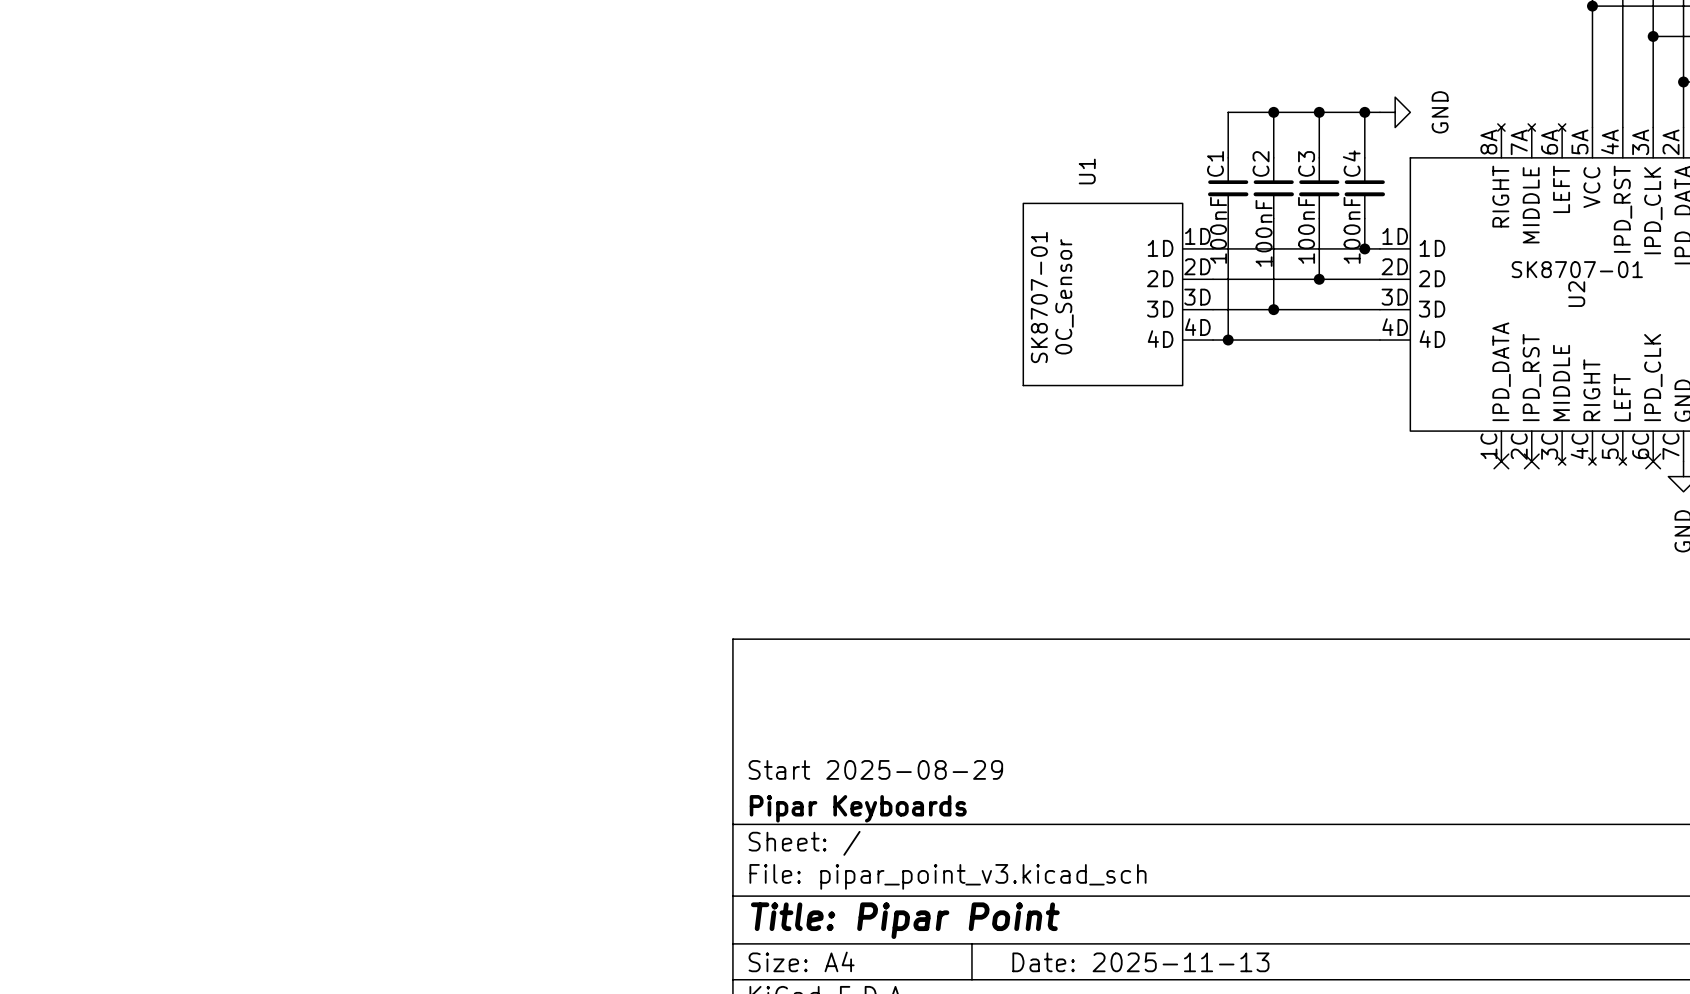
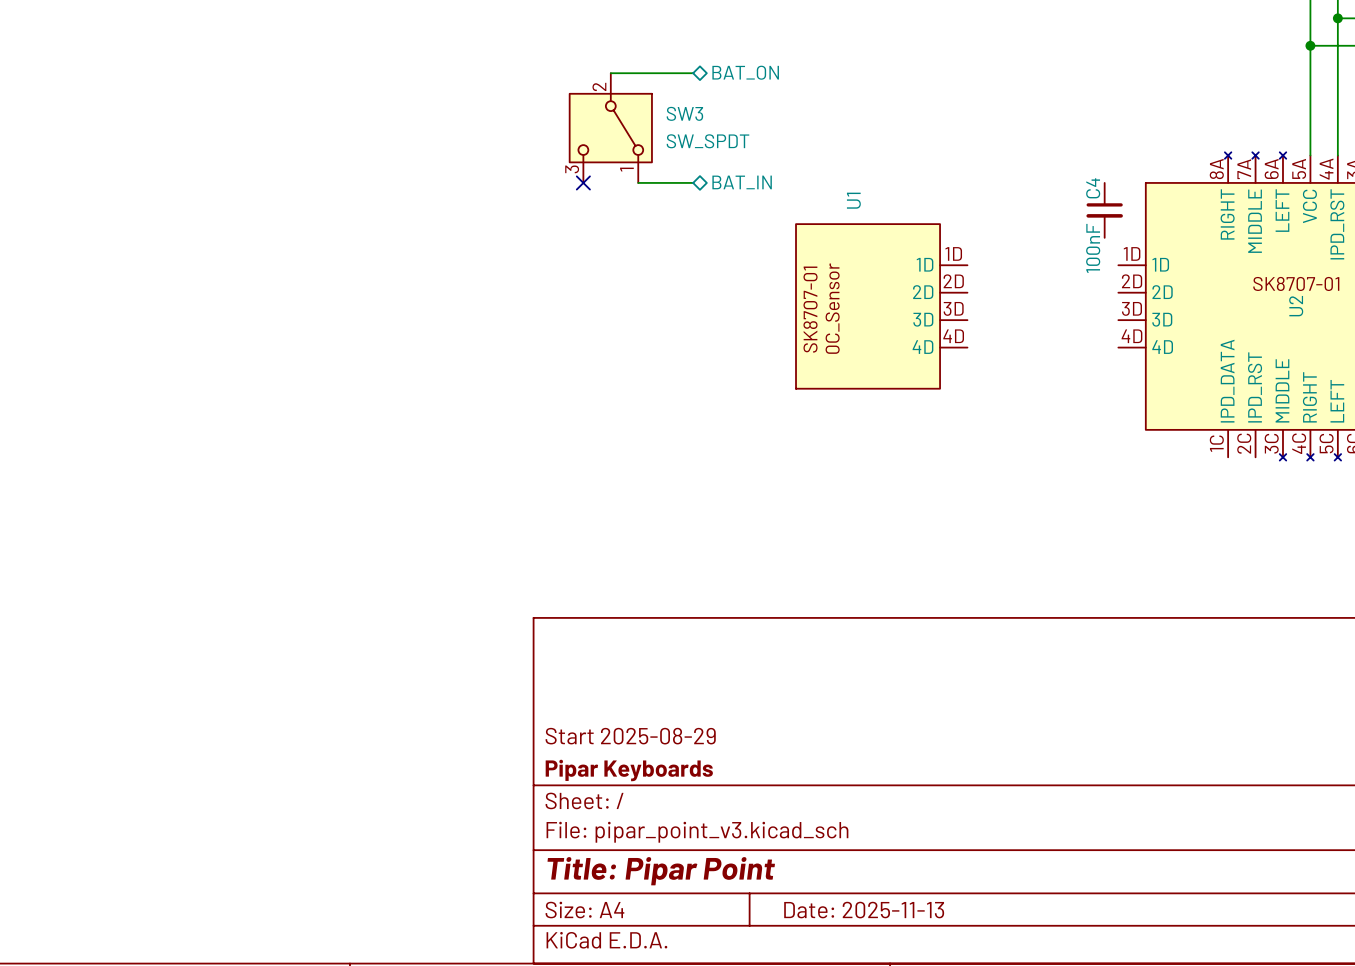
wire: none -> (610, 73) (693, 73)
sheet pin: none -> BAT_ON (745, 72)
SW3: none -> SW_SPDT (610, 128)
wire: (1273, 112) (1273, 157) -> none
junction: (1273, 112) -> none
wire: (1319, 112) (1319, 157) -> none
junction: (1319, 112) -> none
wire: (1364, 112) (1364, 157) -> none
junction: (1364, 112) -> none
wire: (1379, 112) (1228, 112) (1228, 157) -> none
power symbol: GND (1395, 112) -> none
no-connect mark: none -> (583, 182)
wire: none -> (638, 182) (693, 182)
sheet pin: none -> BAT_IN (742, 182)
C1: 100nF (1228, 188) -> none
C2: 100nF (1273, 188) -> none
C3: 100nF (1319, 188) -> none
wire: (1228, 218) (1228, 340) -> none
wire: (1273, 218) (1273, 309) -> none
wire: (1319, 218) (1319, 279) -> none
wire: (1364, 218) (1364, 248) -> none
wire: (1213, 248) (1379, 248) -> none
junction: (1364, 248) -> none
wire: (1213, 279) (1379, 279) -> none
junction: (1319, 279) -> none
wire: (1213, 309) (1379, 309) -> none
junction: (1273, 309) -> none
wire: (1213, 340) (1379, 340) -> none
junction: (1228, 340) -> none
no-connect mark: (1501, 461) -> none
no-connect mark: (1531, 461) -> none

